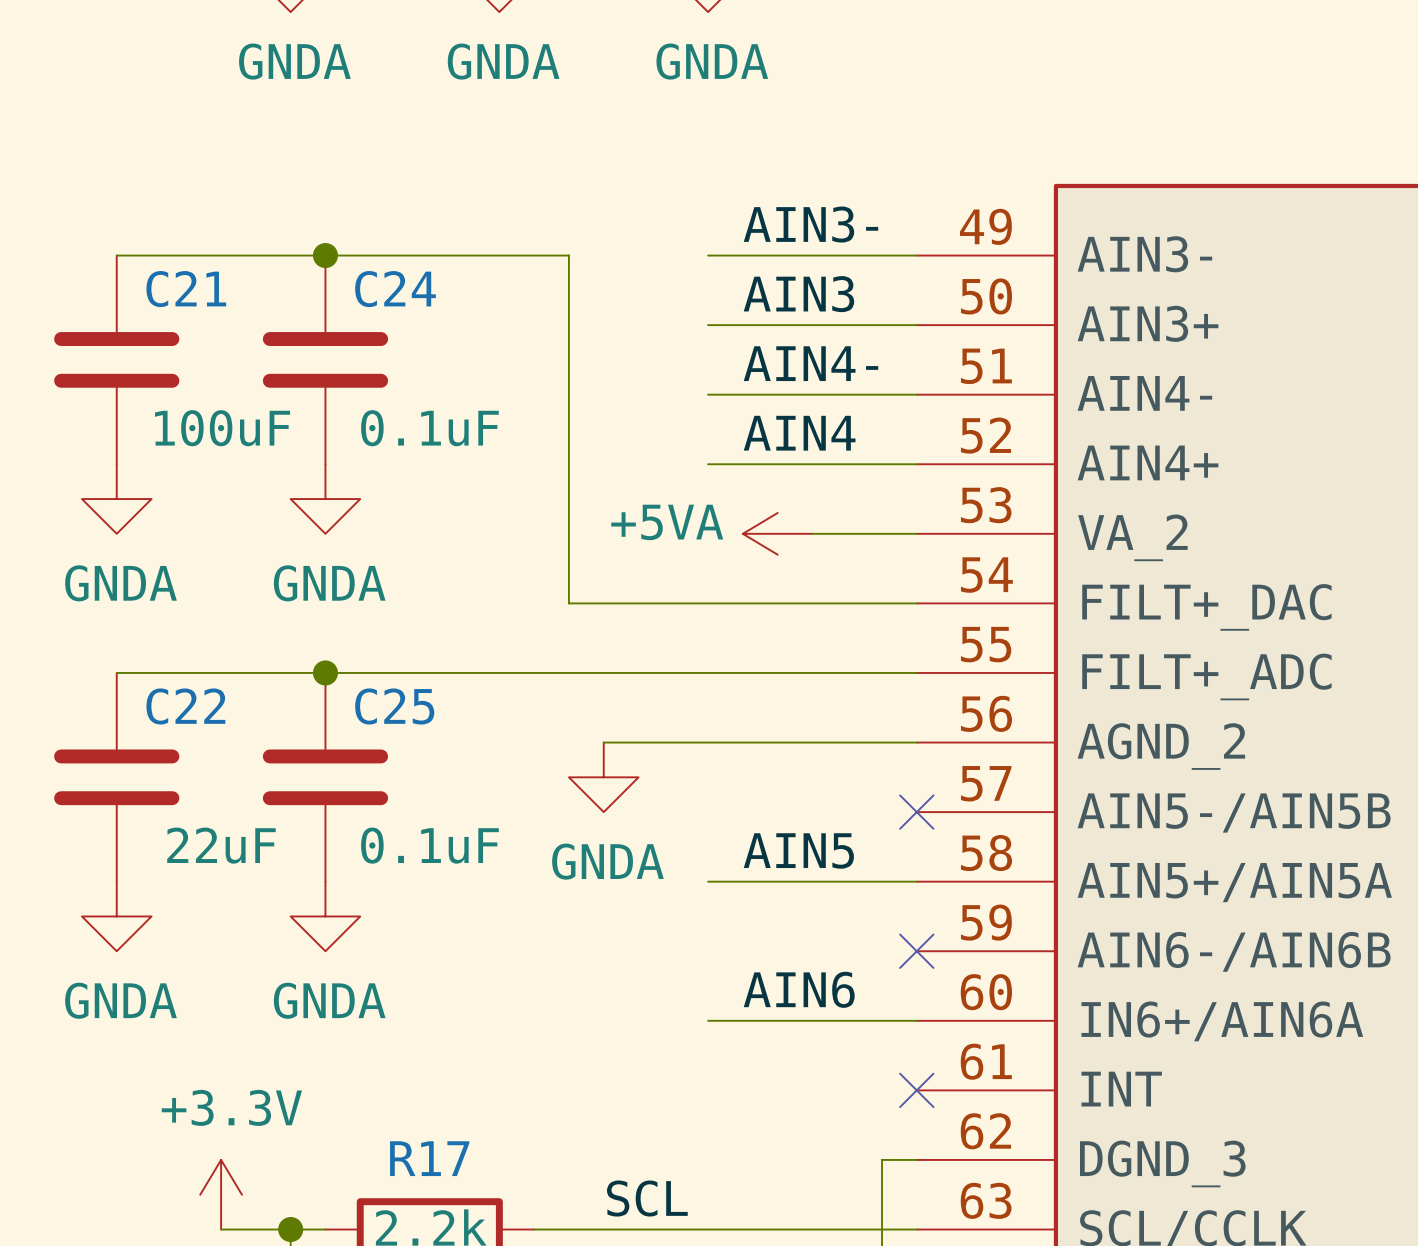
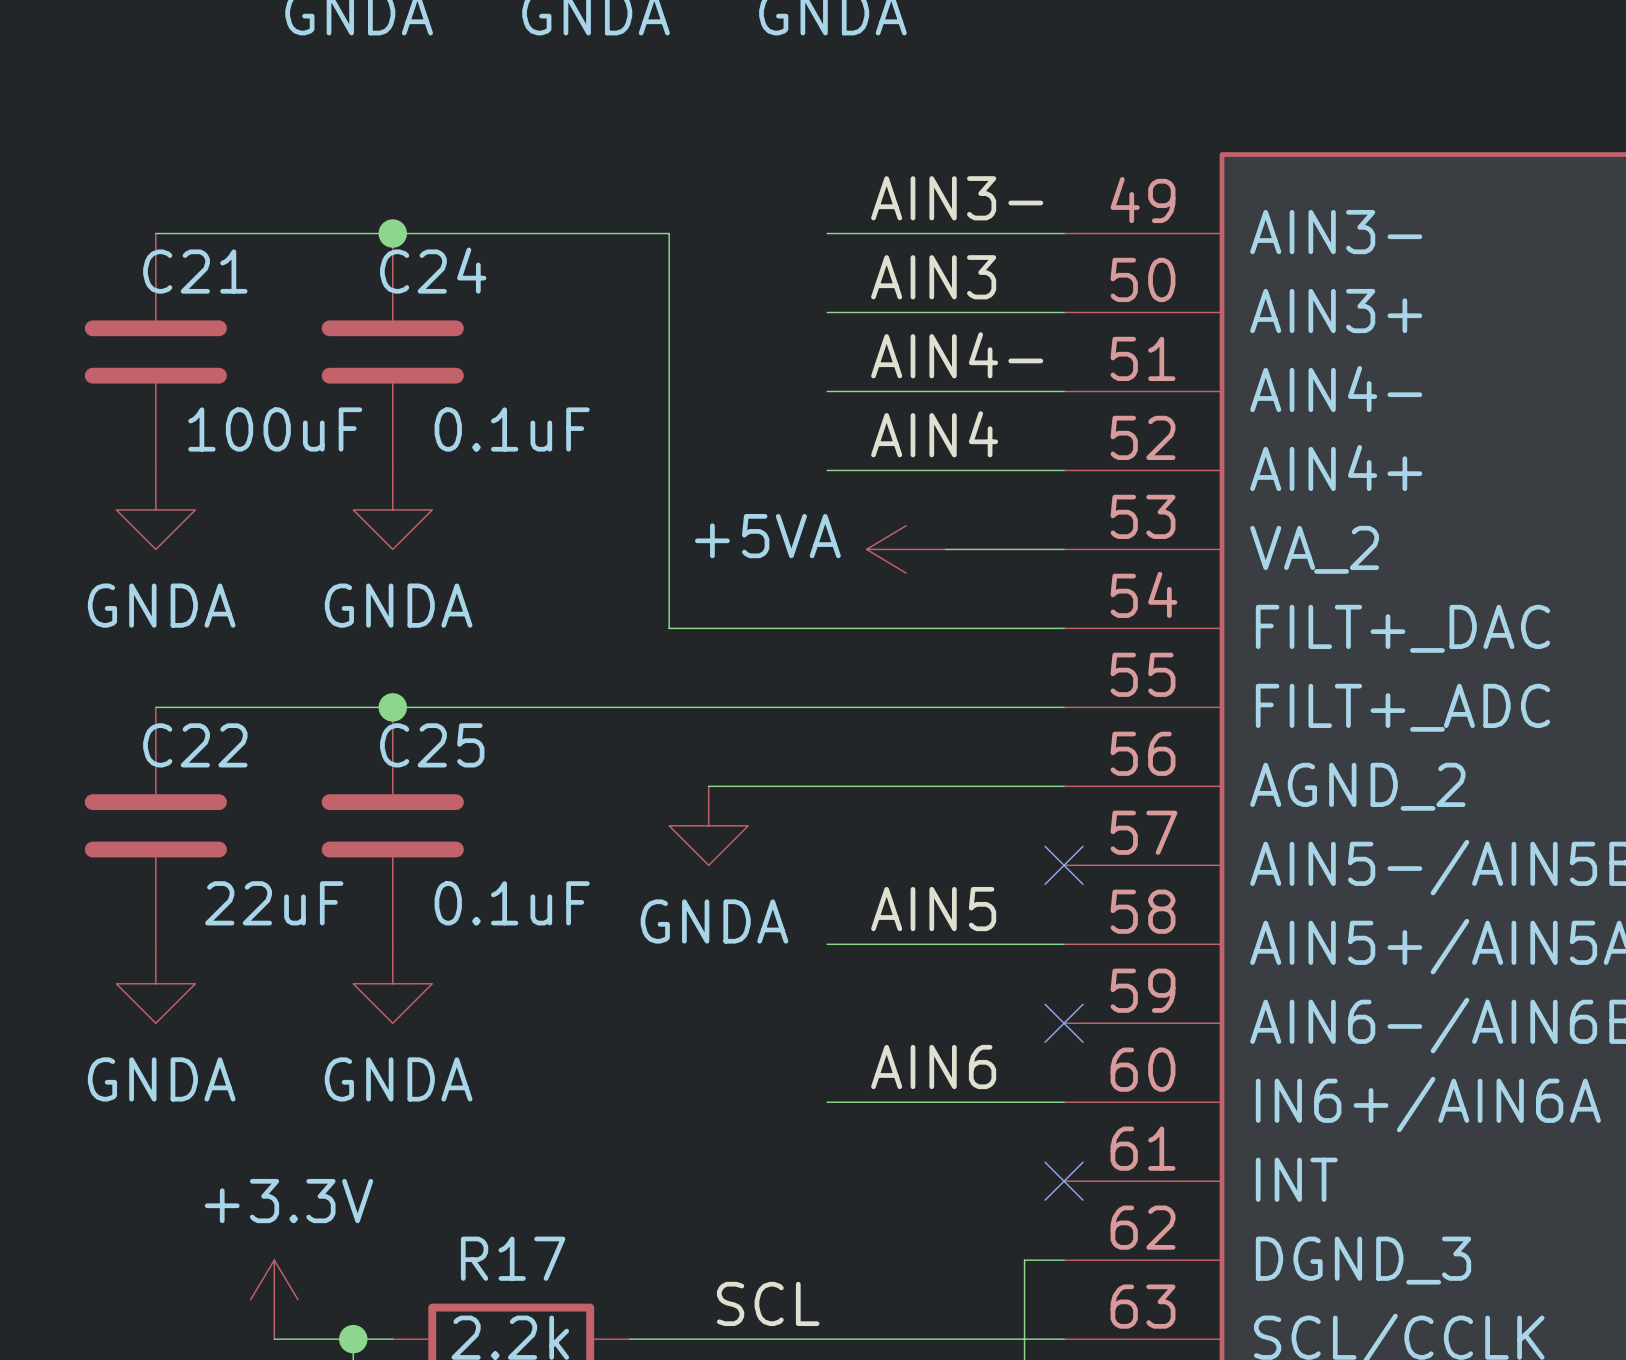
C21 name position: C21 (186, 289) -> C21 (195, 271)
C24 name position: C24 (395, 289) -> C24 (433, 270)
C22 name position: C22 (185, 706) -> C22 (195, 745)
C25 name position: C25 (394, 706) -> C25 (432, 745)

